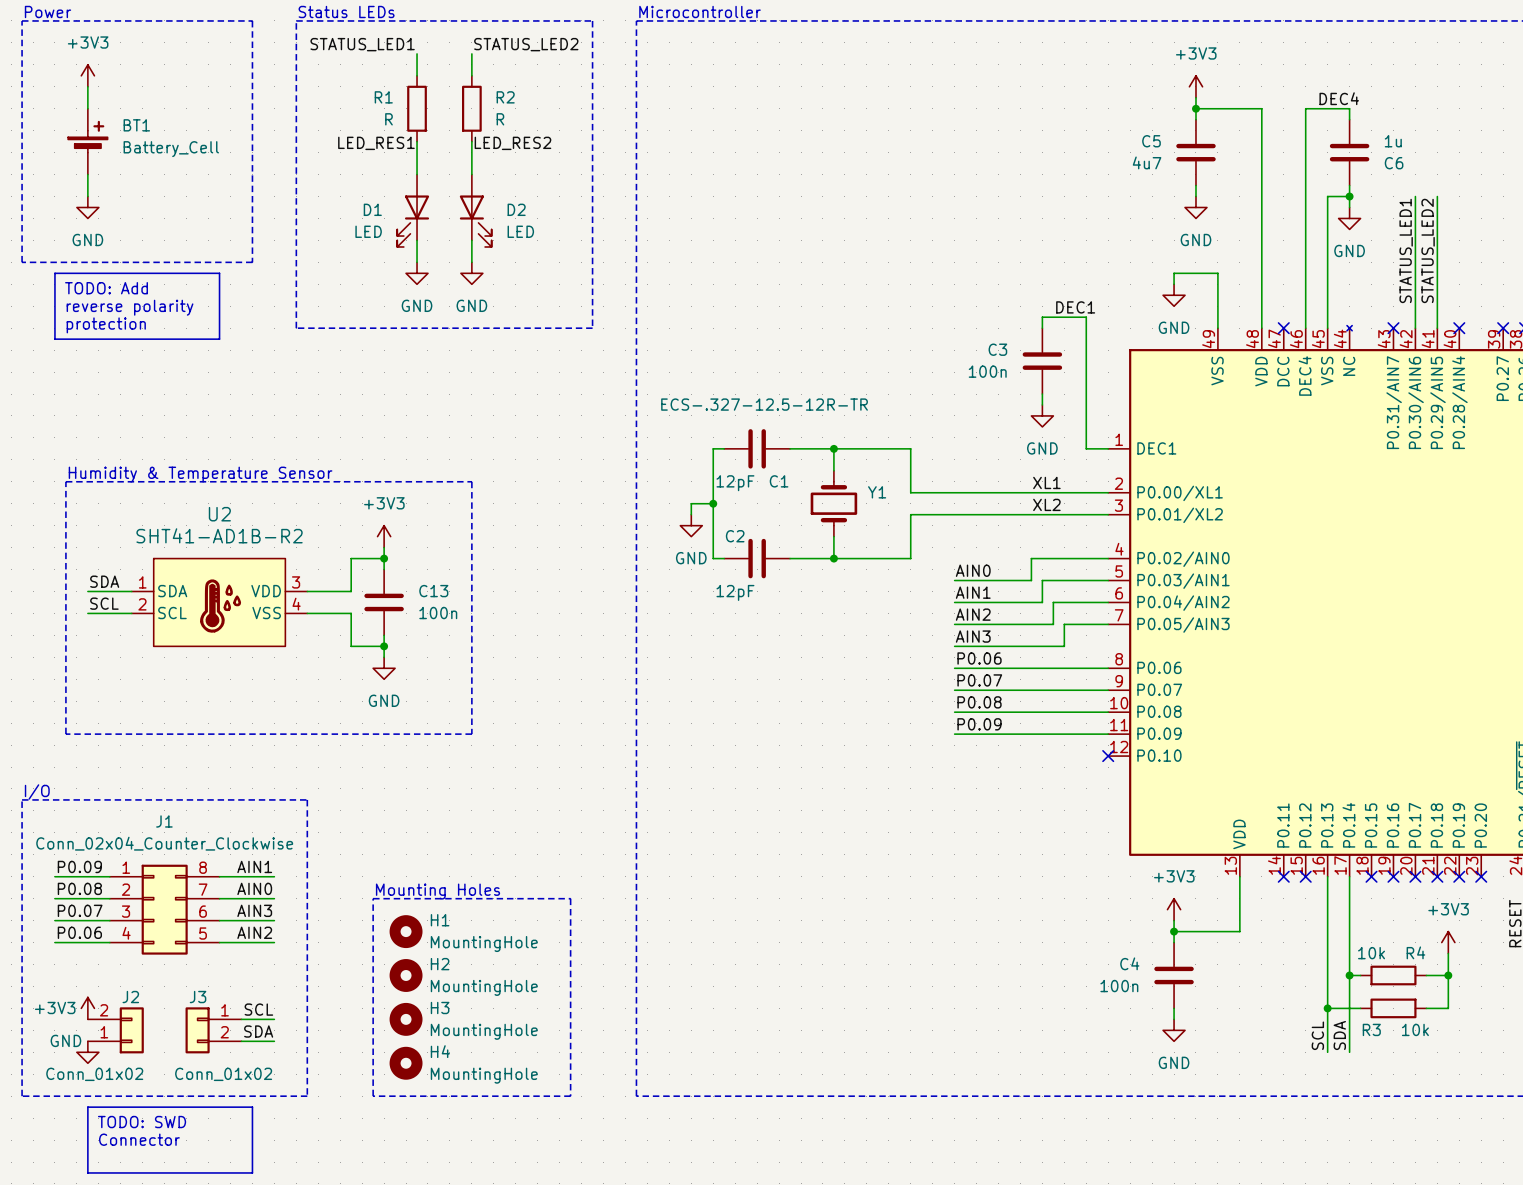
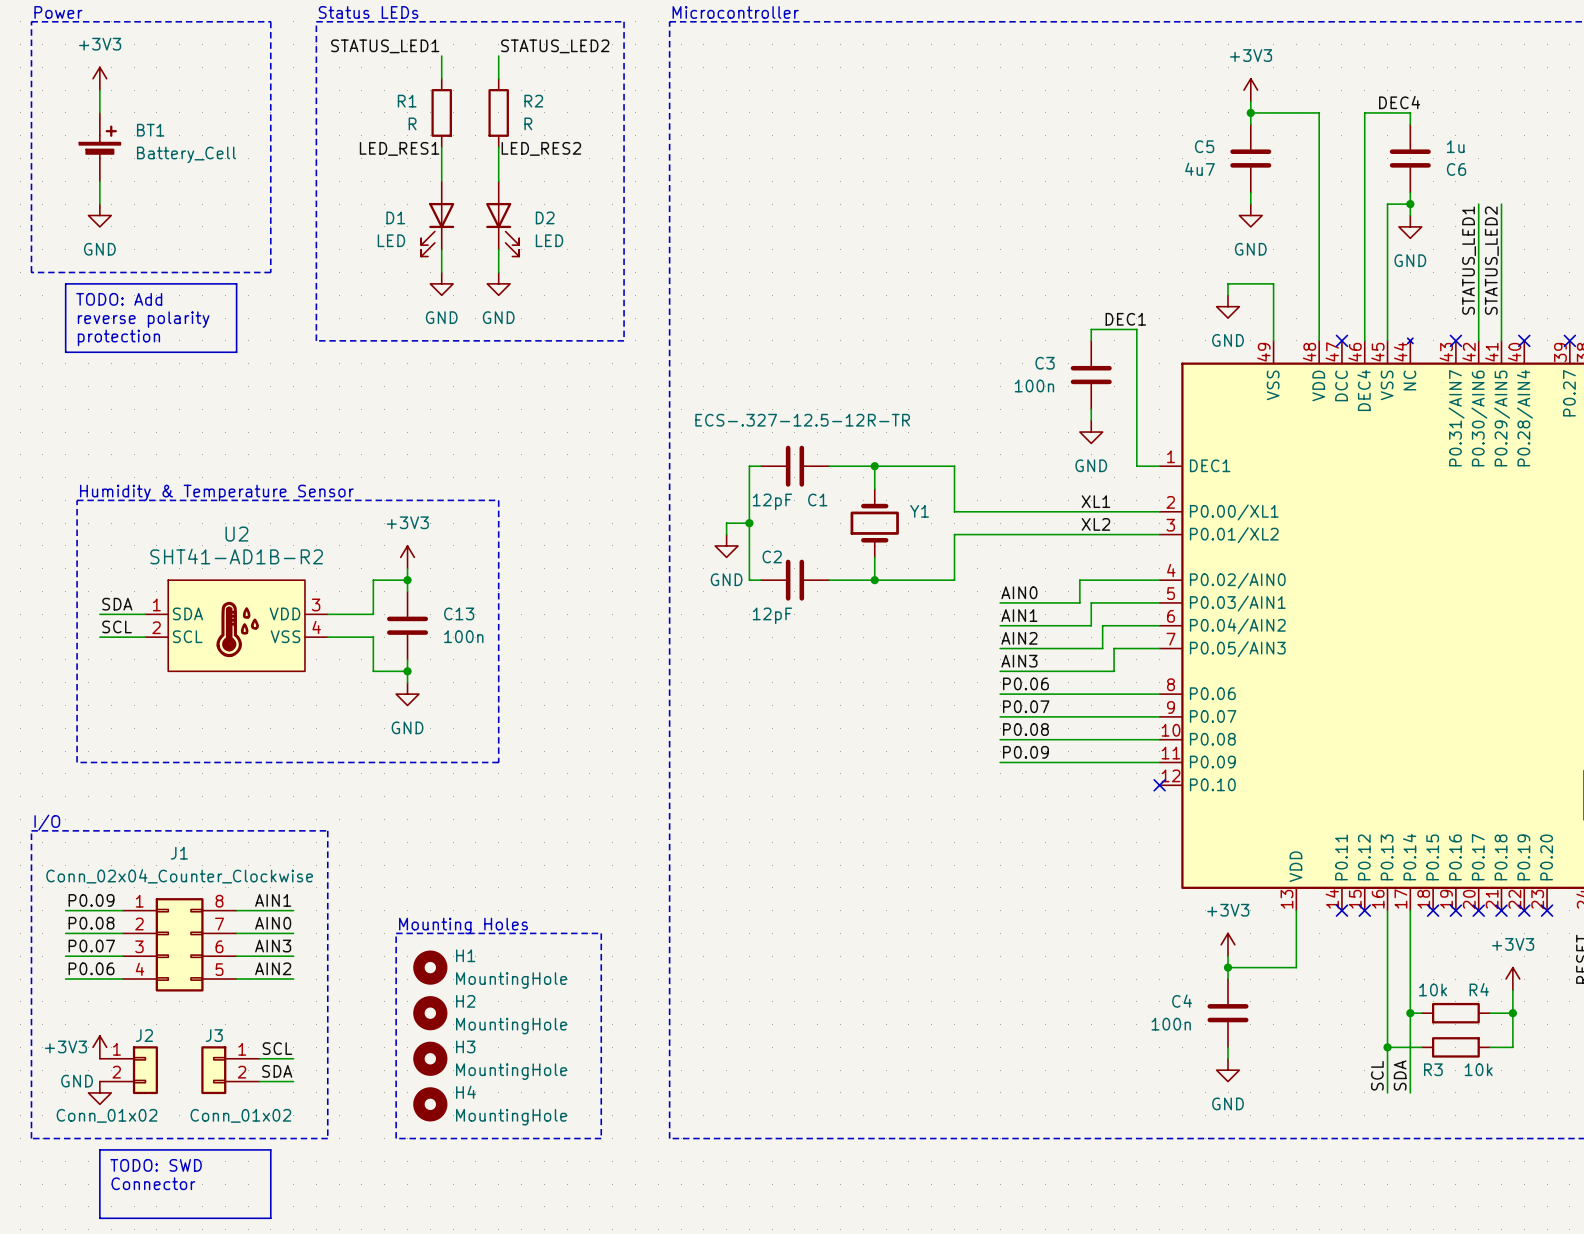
J2 flip: as is (131, 1030) -> up-down (145, 1070)

